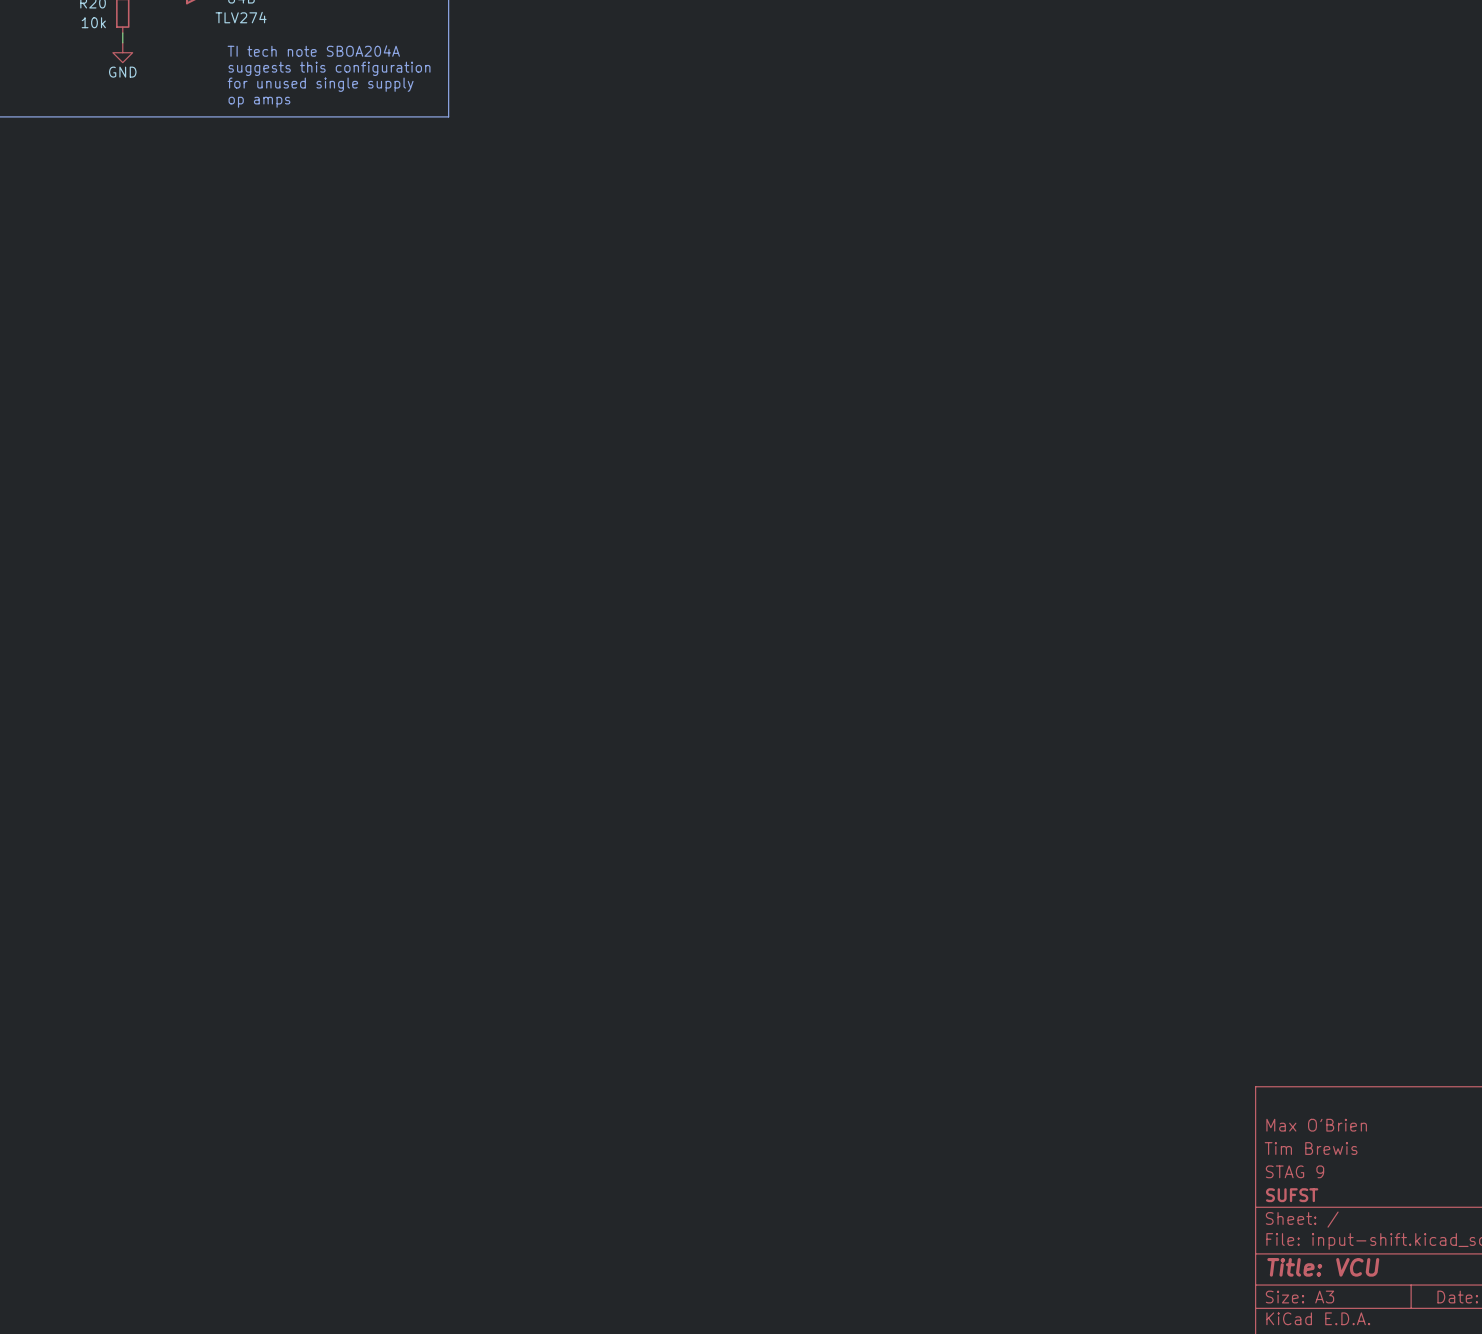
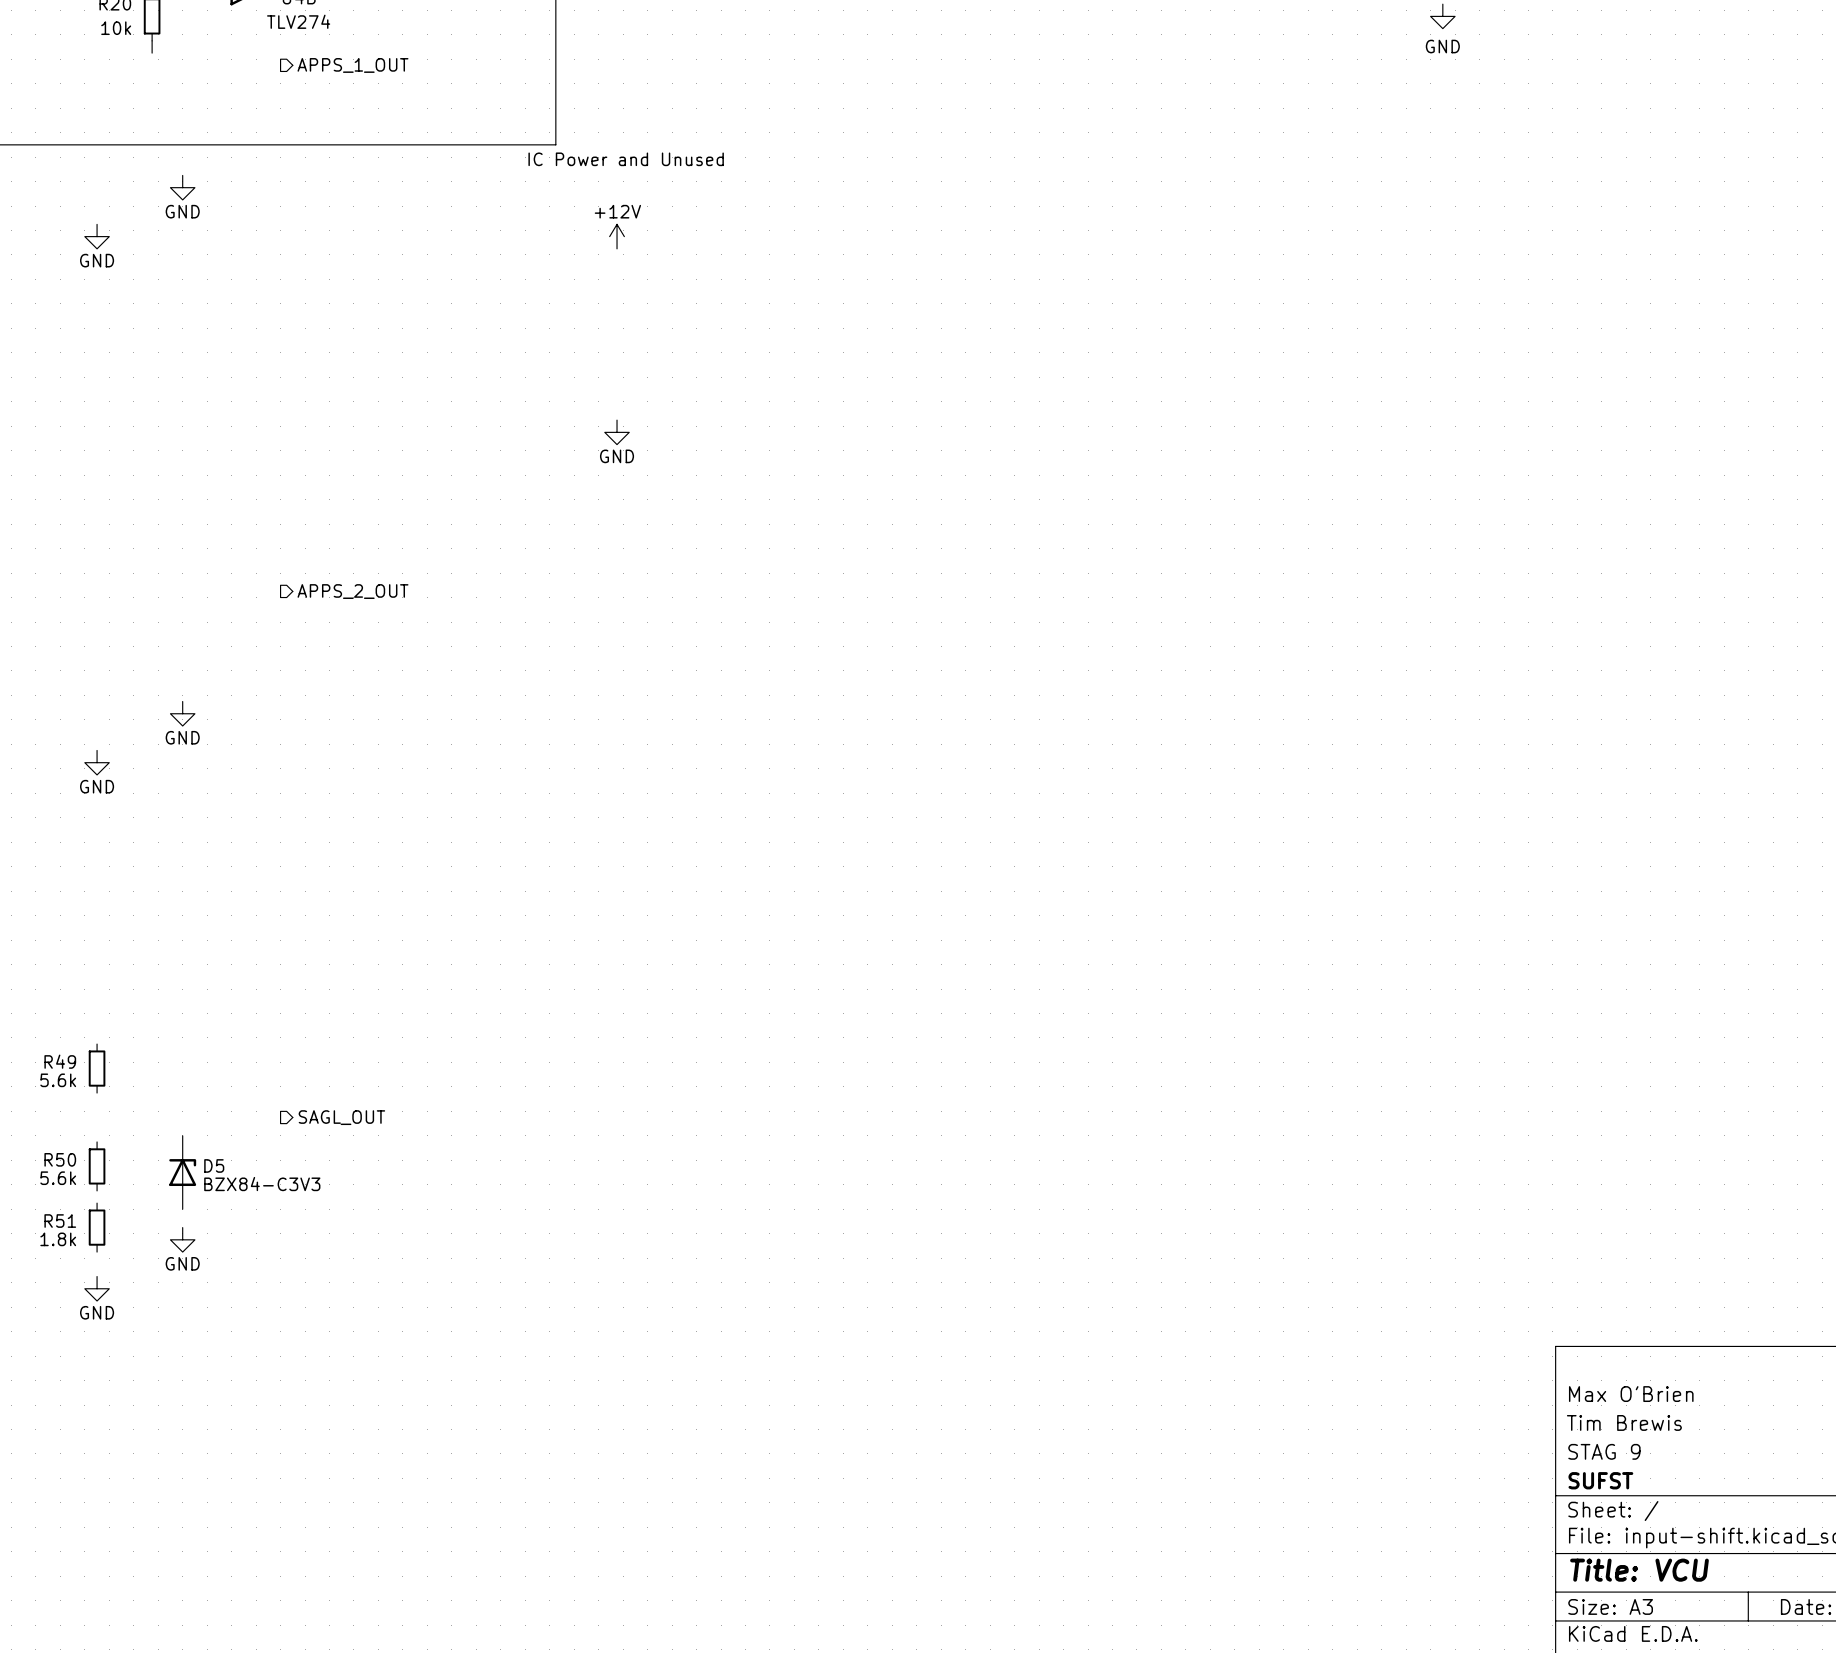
power symbol: none -> GND (1442, 16)
text: TI tech note SBOA204A (313, 51) -> none
power symbol: GND (122, 52) -> none
hierarchical label: none -> APPS_1_OUT (353, 65)
text: suggests this configuration (329, 68) -> none
text: for unused single supply (320, 84) -> none
text: op amps (259, 102) -> none
text: none -> IC Power and Unused (626, 159)
power symbol: none -> GND (182, 187)
power symbol: none -> GND (97, 236)
power symbol: none -> +12V (617, 236)
power symbol: none -> GND (617, 432)
hierarchical label: none -> APPS_2_OUT (353, 591)
power symbol: none -> GND (182, 713)
power symbol: none -> GND (97, 762)
R49: none -> 5.6k (97, 1068)
hierarchical label: none -> SAGL_OUT (341, 1117)
R50: none -> 5.6k (97, 1166)
D5: none -> BZX84-C3V3 (182, 1172)
R51: none -> 1.8k (97, 1227)
power symbol: none -> GND (182, 1239)
power symbol: none -> GND (97, 1288)

